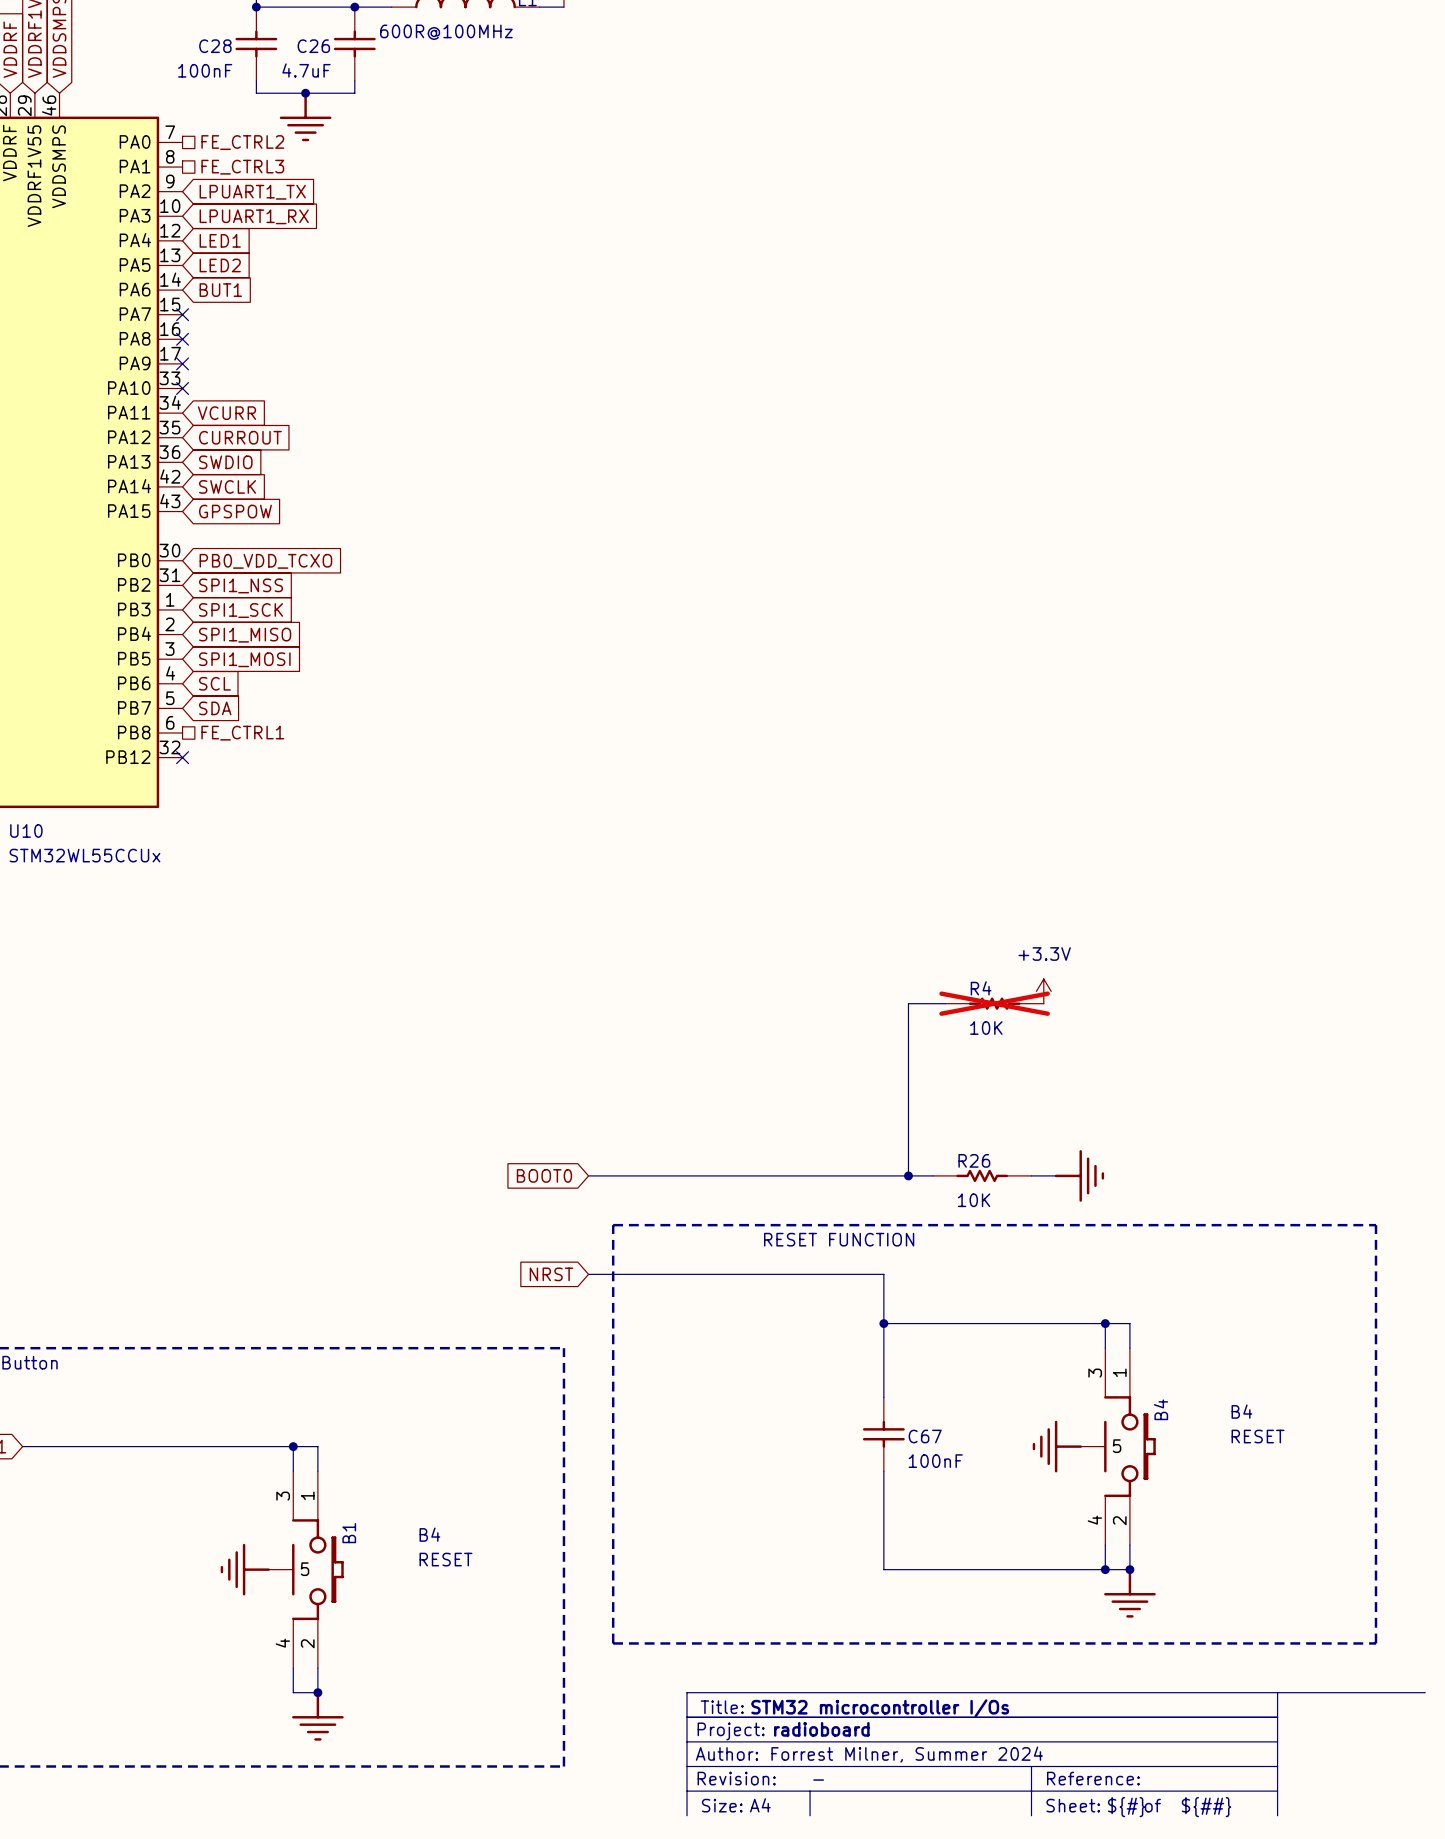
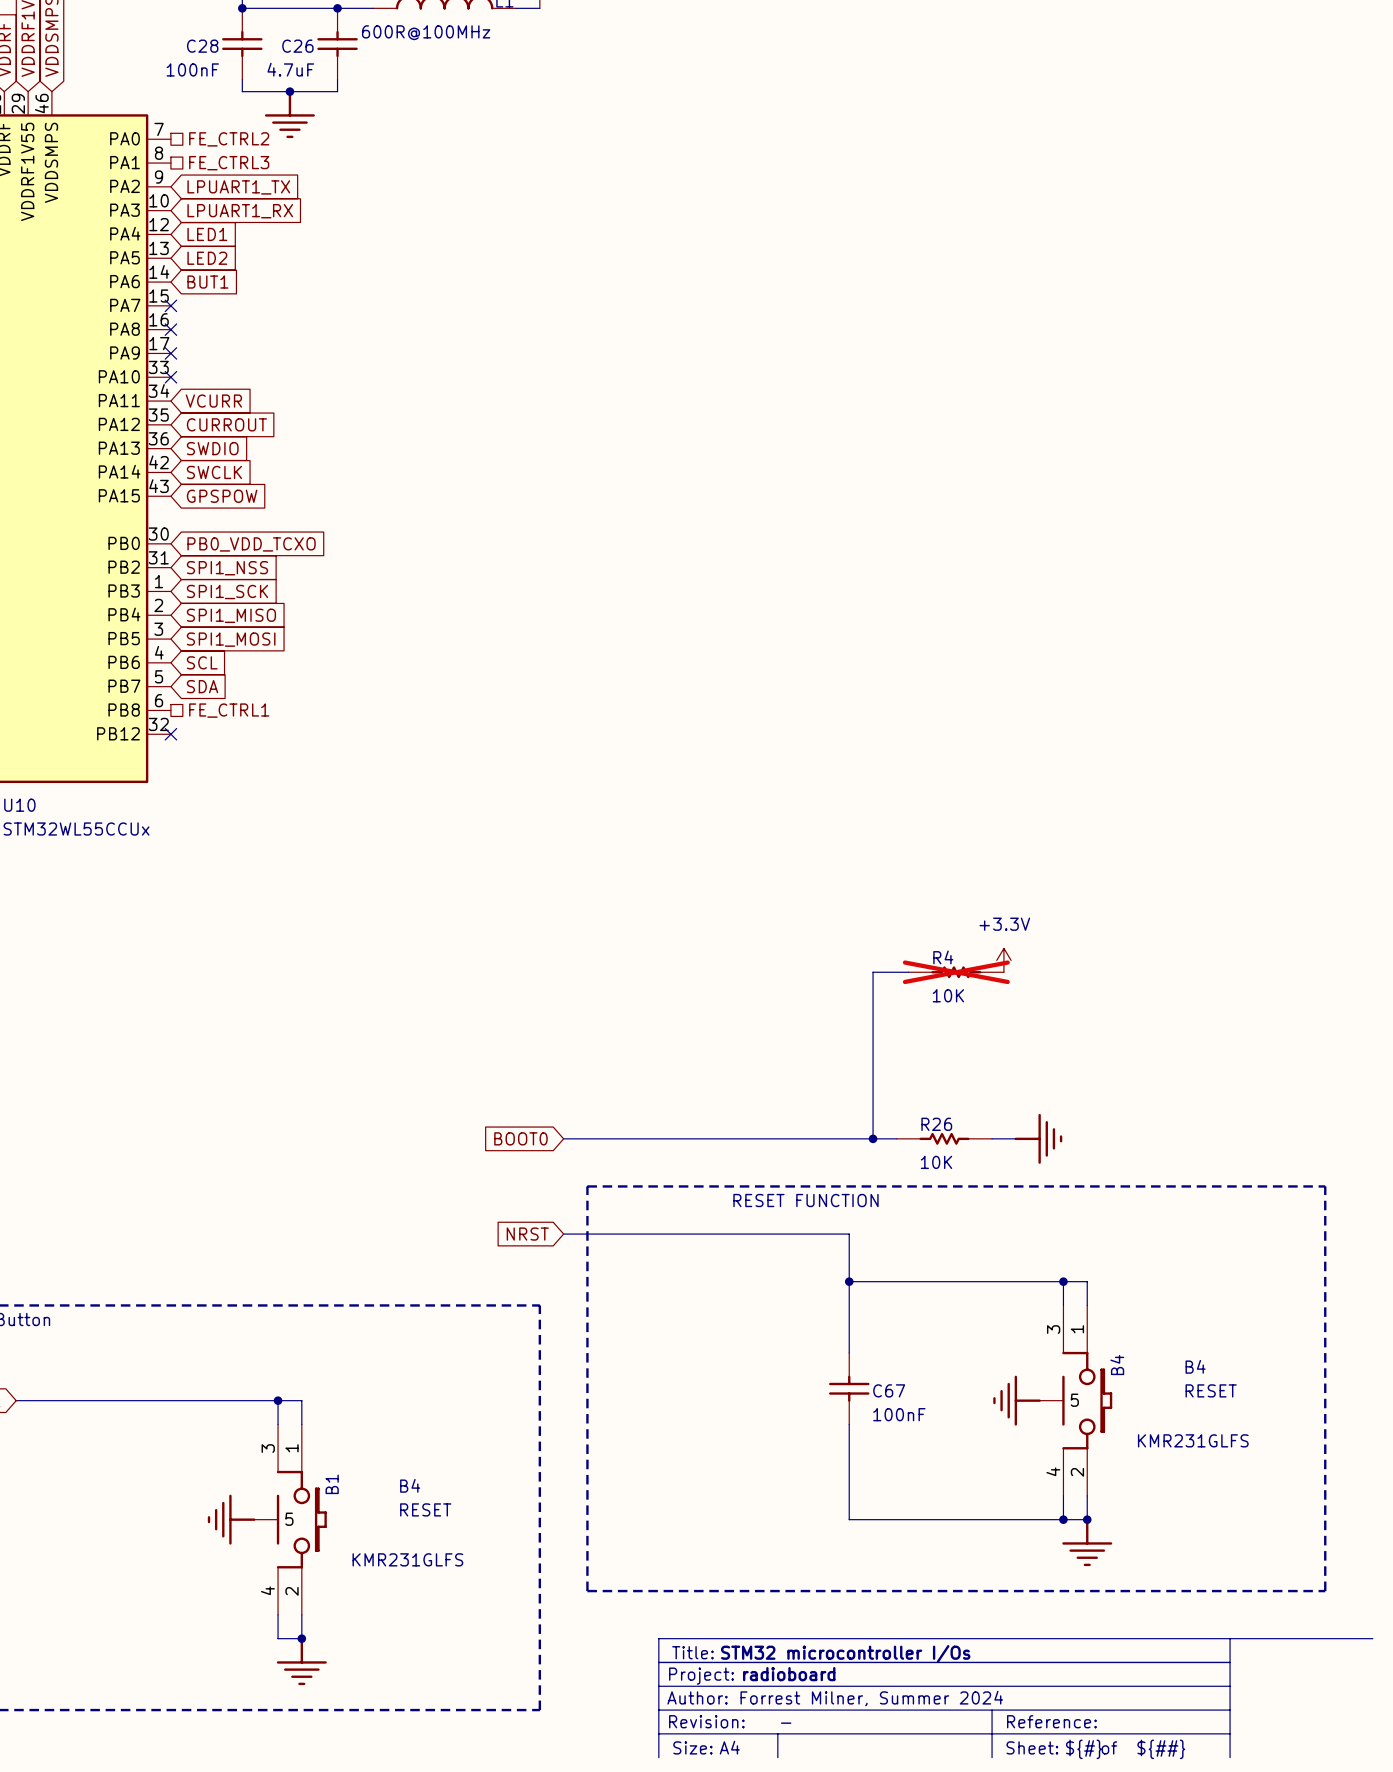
B4 text: none -> KMR231GLFS (1193, 1440)
B1 text: none -> KMR231GLFS (407, 1559)

